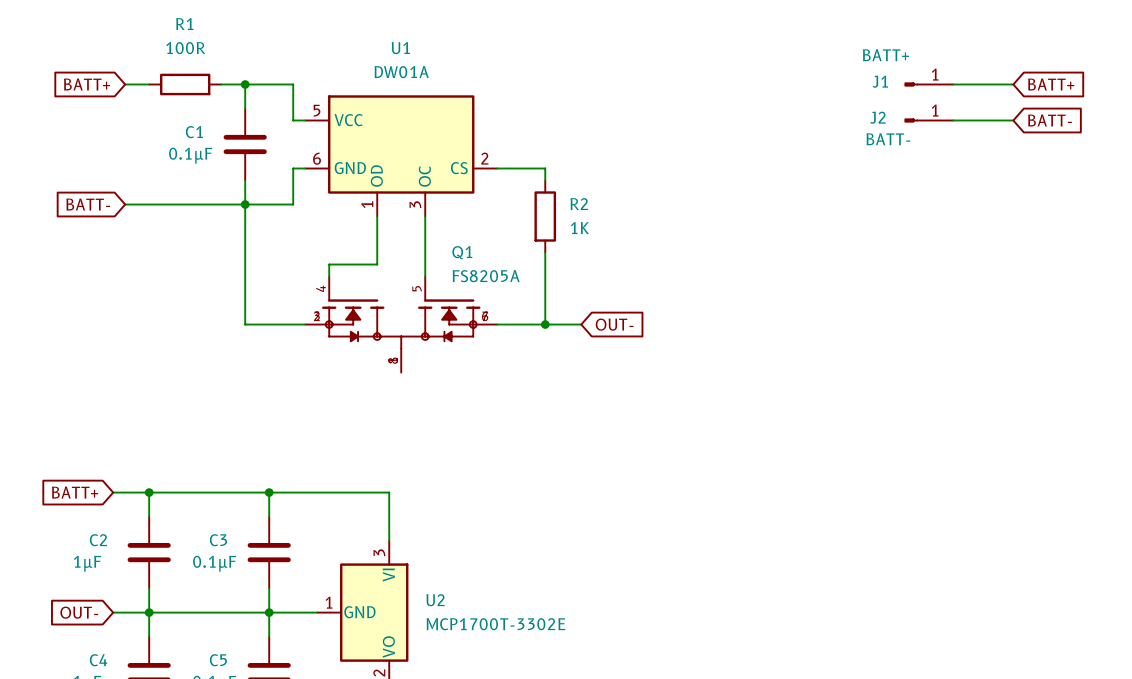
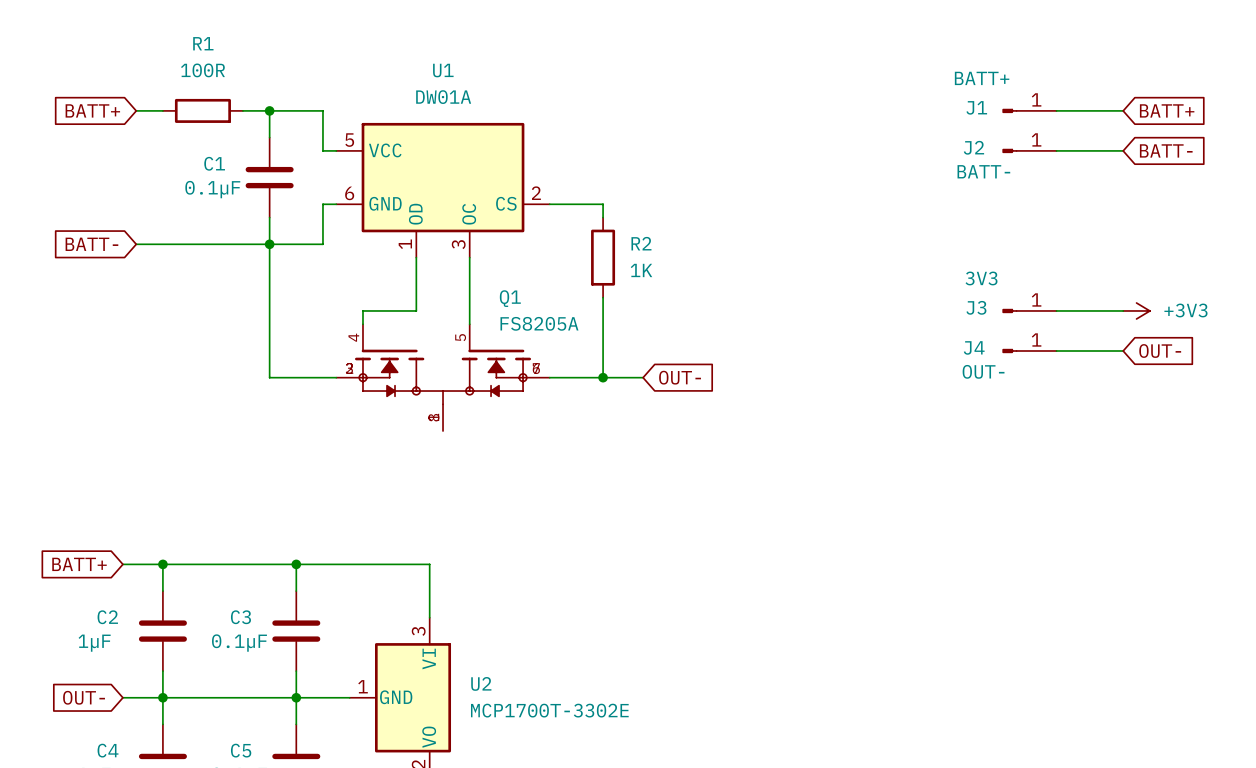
J3: none -> 3V3 (1029, 310)
wire: none -> (1056, 310) (1123, 310)
power symbol: none -> +3V3 (1136, 310)
J4: none -> OUT- (1029, 351)
wire: none -> (1056, 351) (1123, 351)
global label: none -> OUT- (1160, 351)

